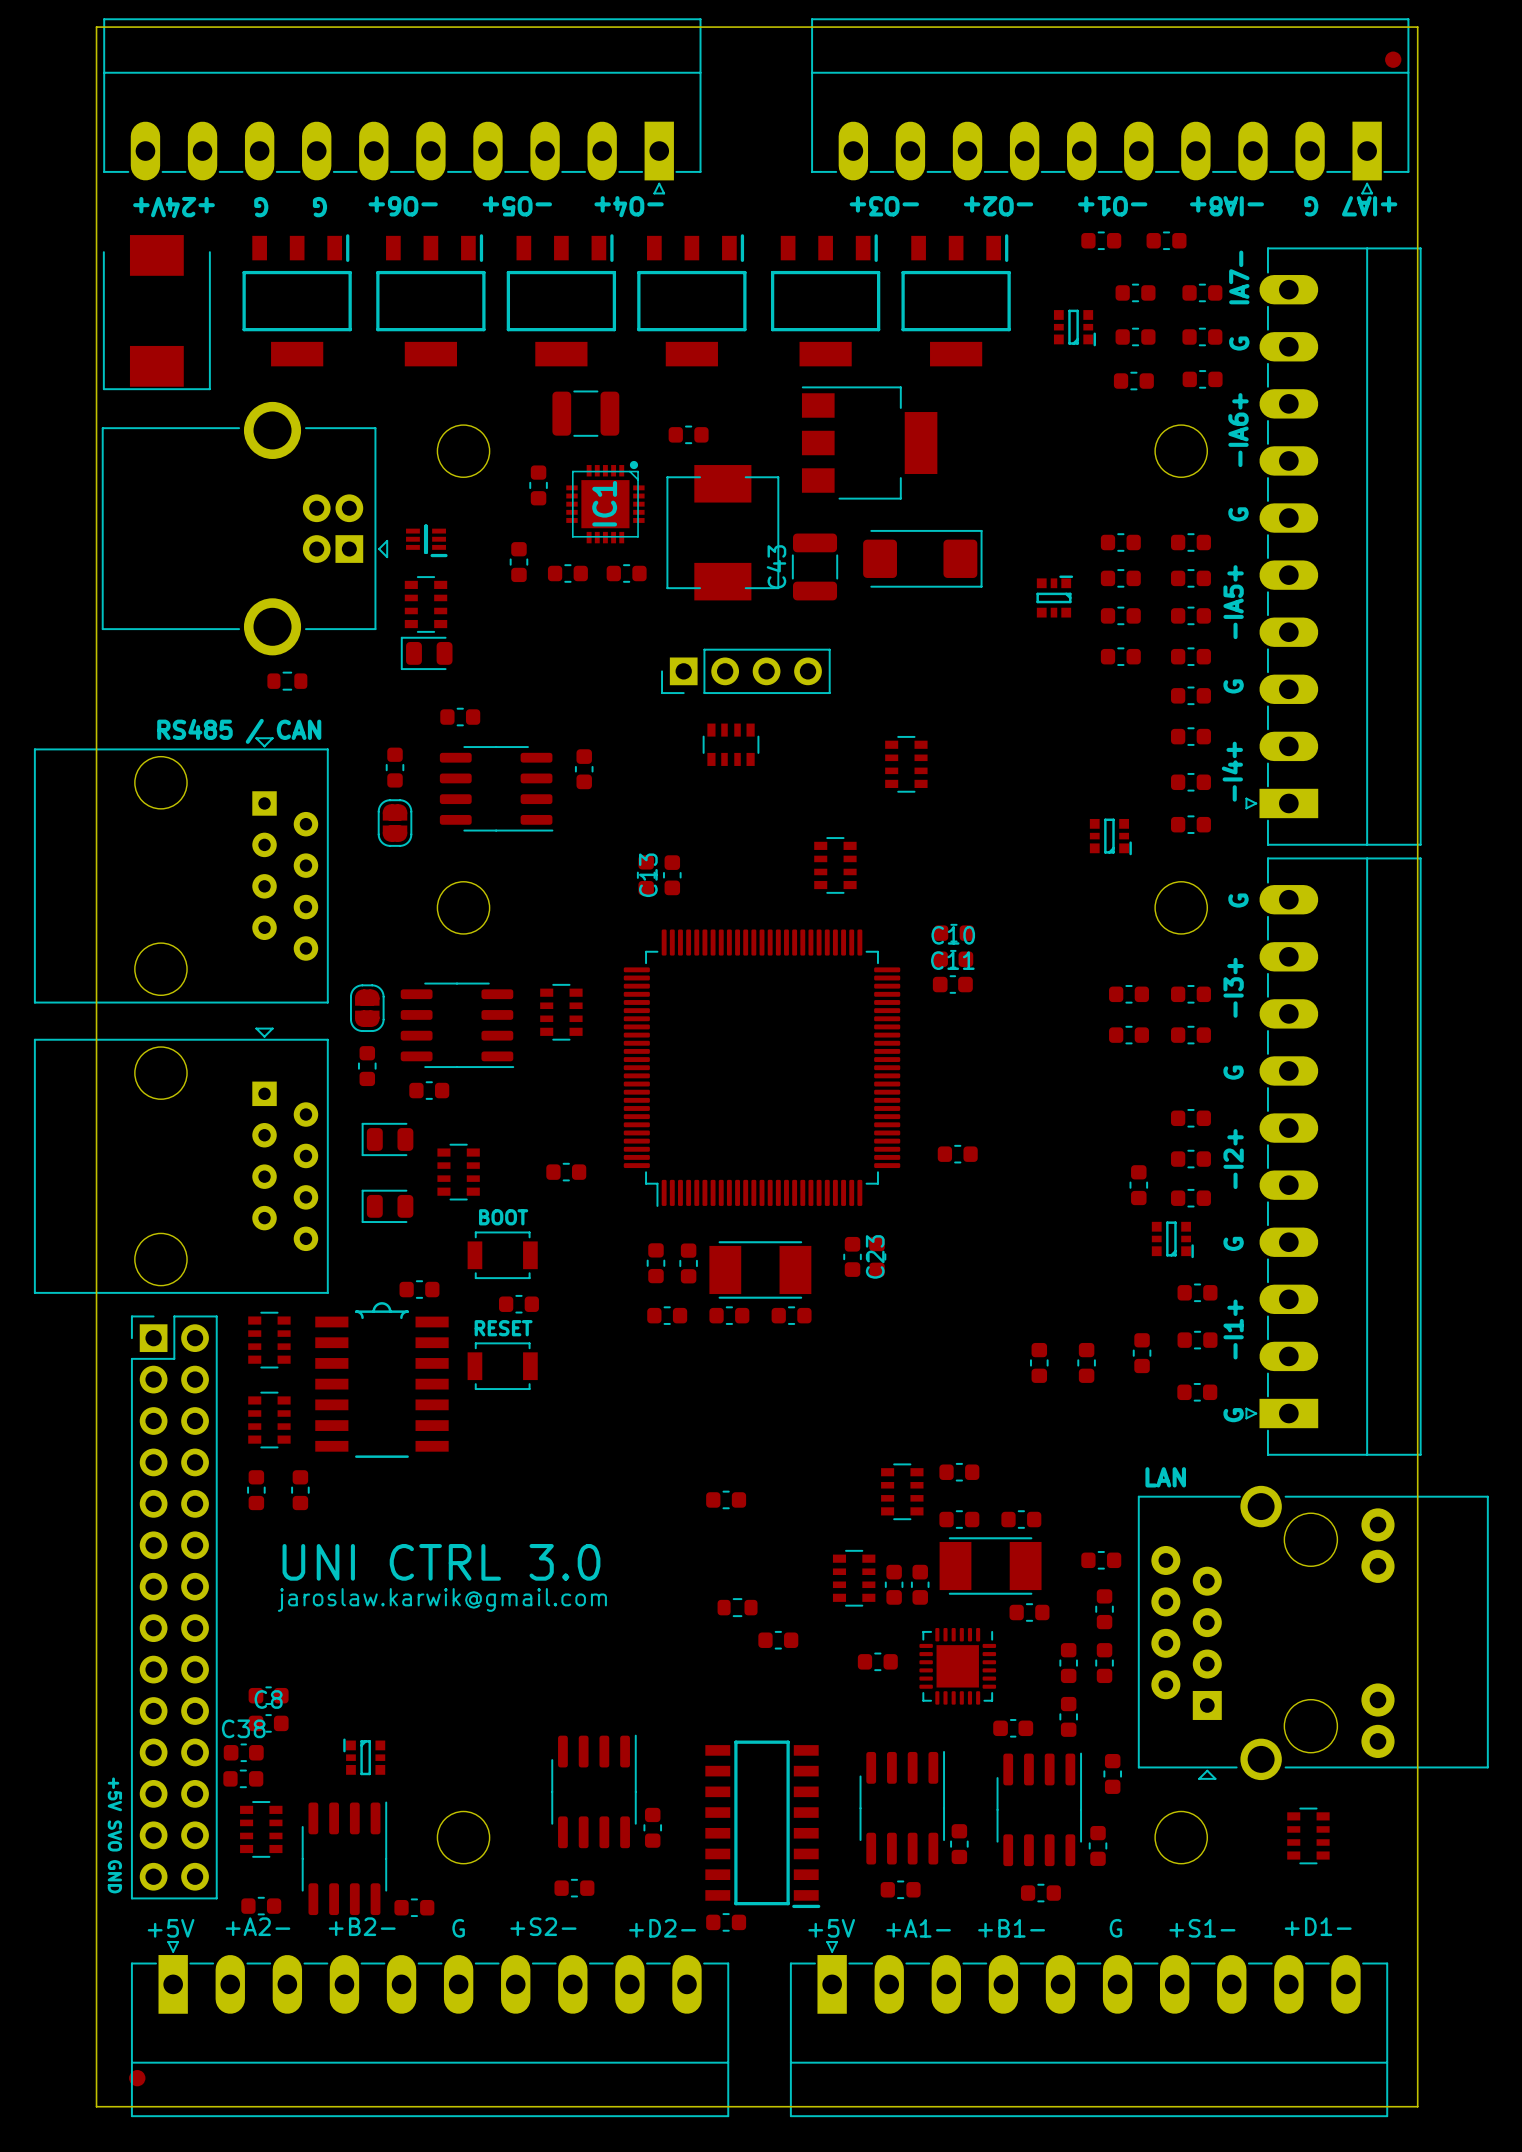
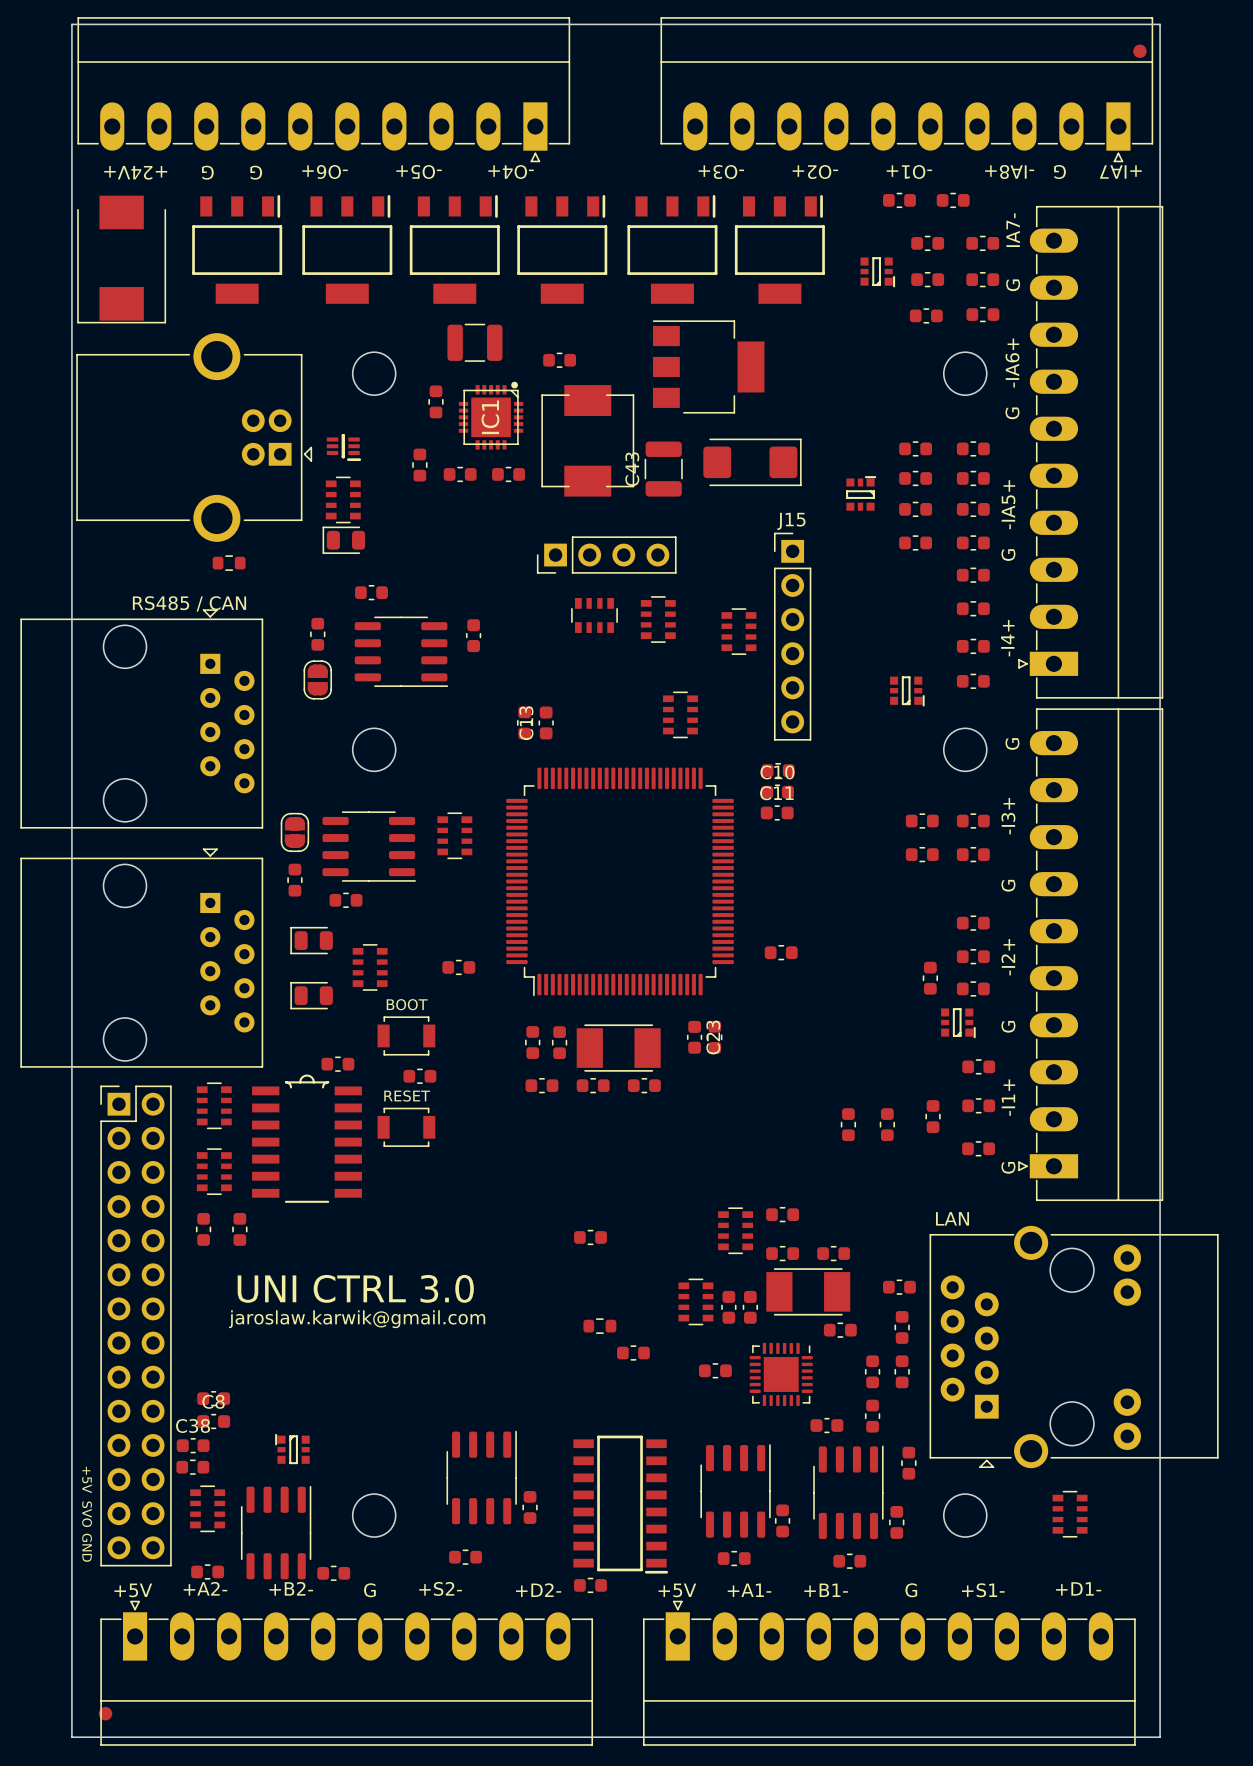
part: none -> (658, 619)
J15: none -> (792, 636)

